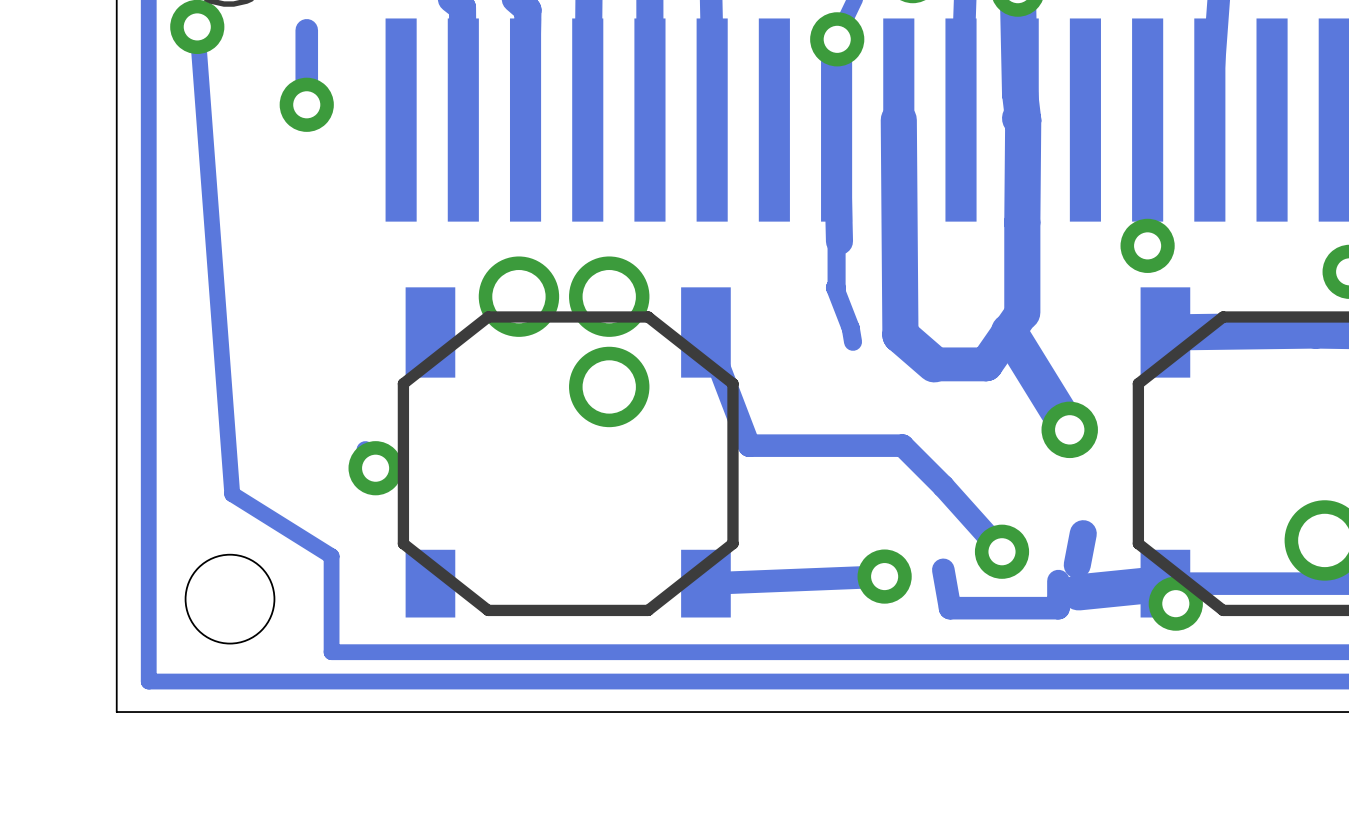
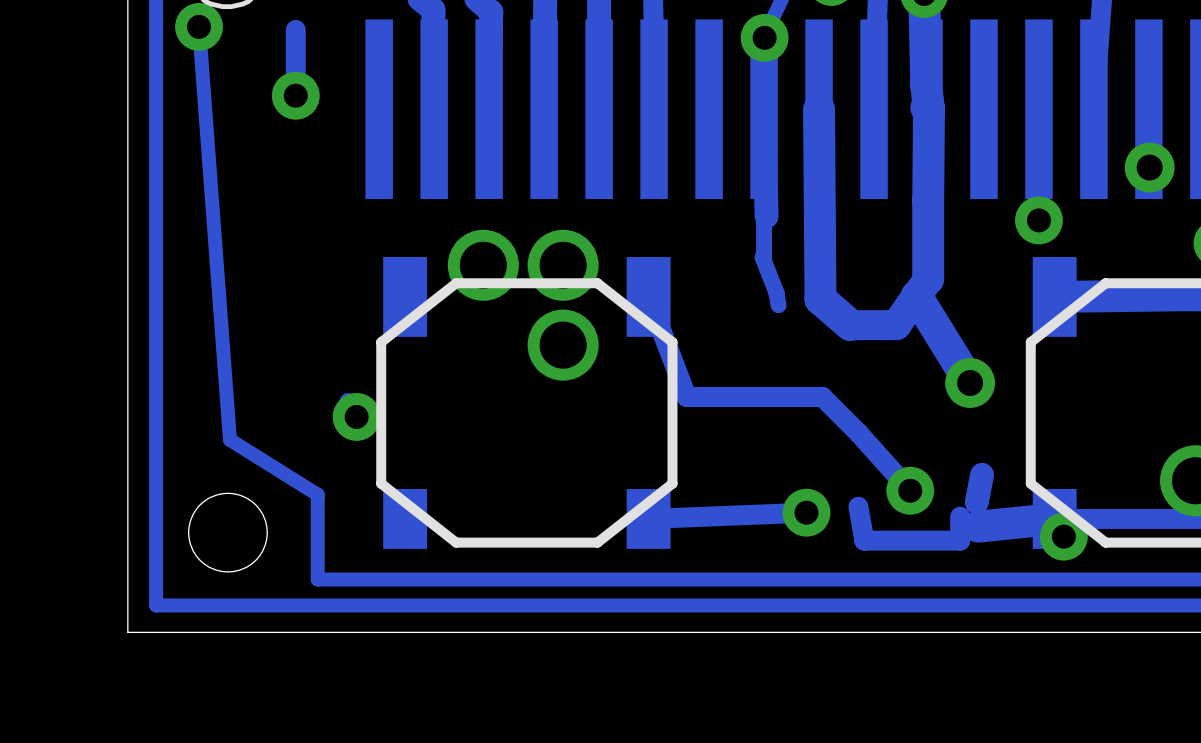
via: none -> (1149, 167)

